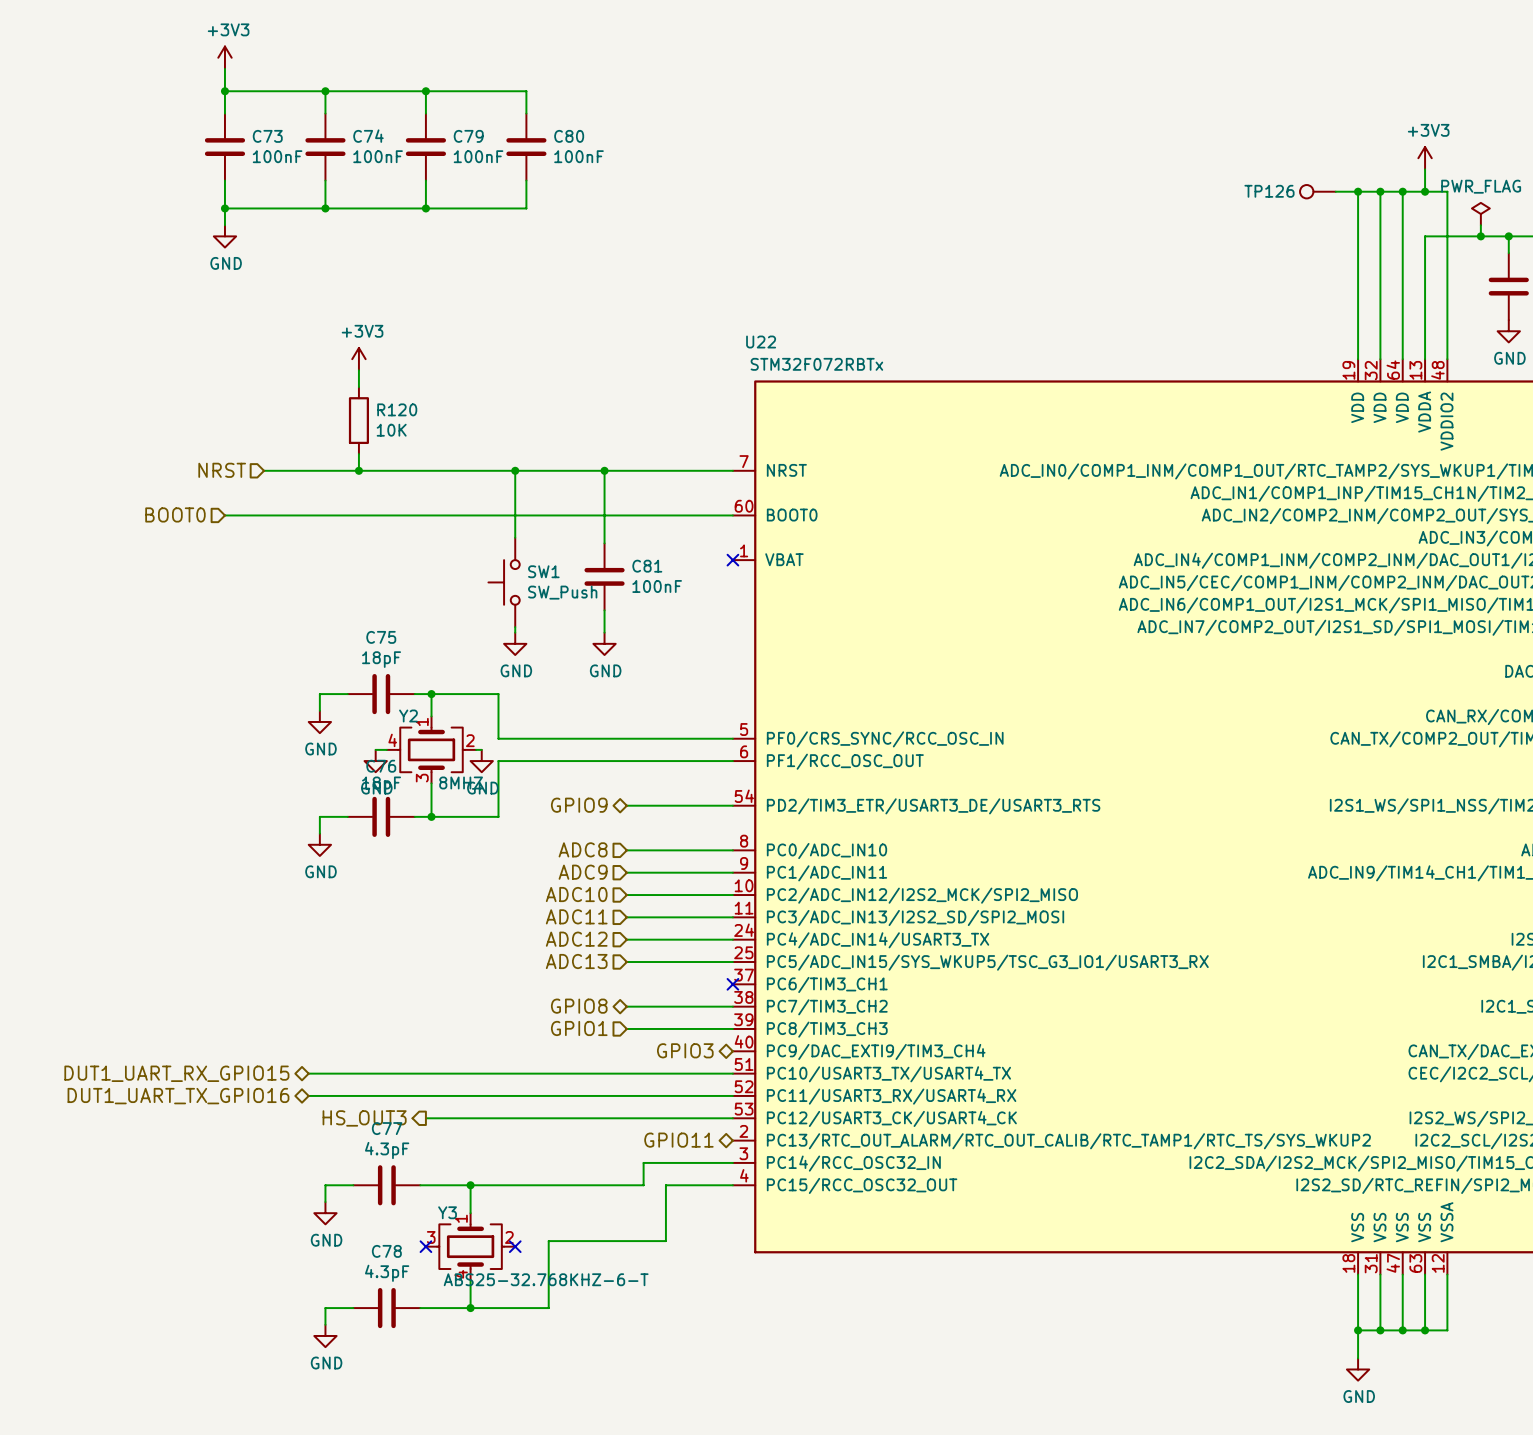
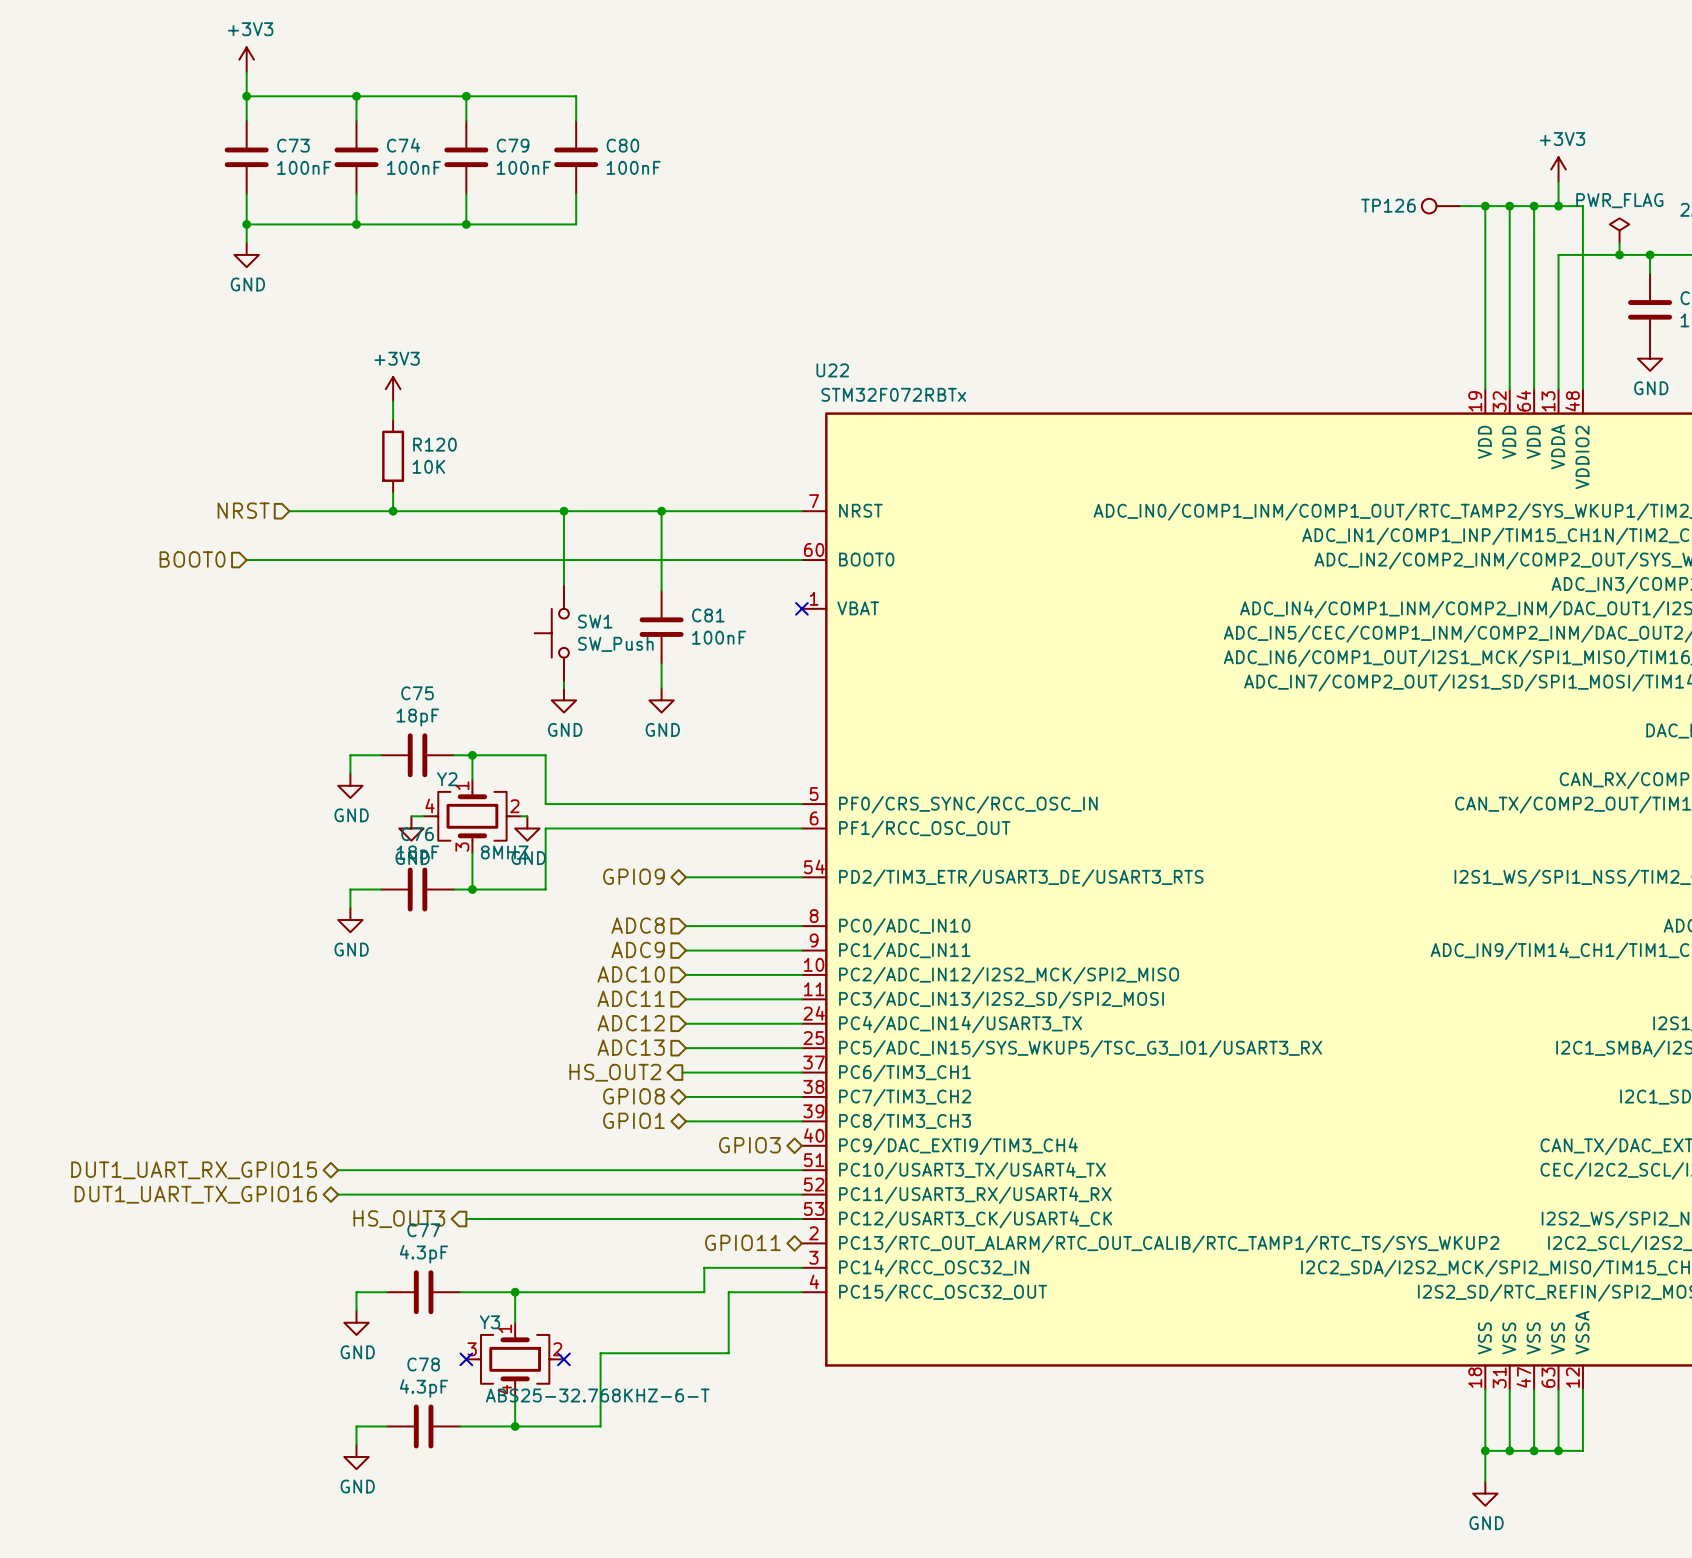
hierarchical label: none -> HS_OUT2 (615, 1072)
wire: none -> (682, 1072) (801, 1072)
no-connect mark: (732, 984) -> none
hierarchical label shape: input (579, 1028) -> bidirectional (633, 1120)

